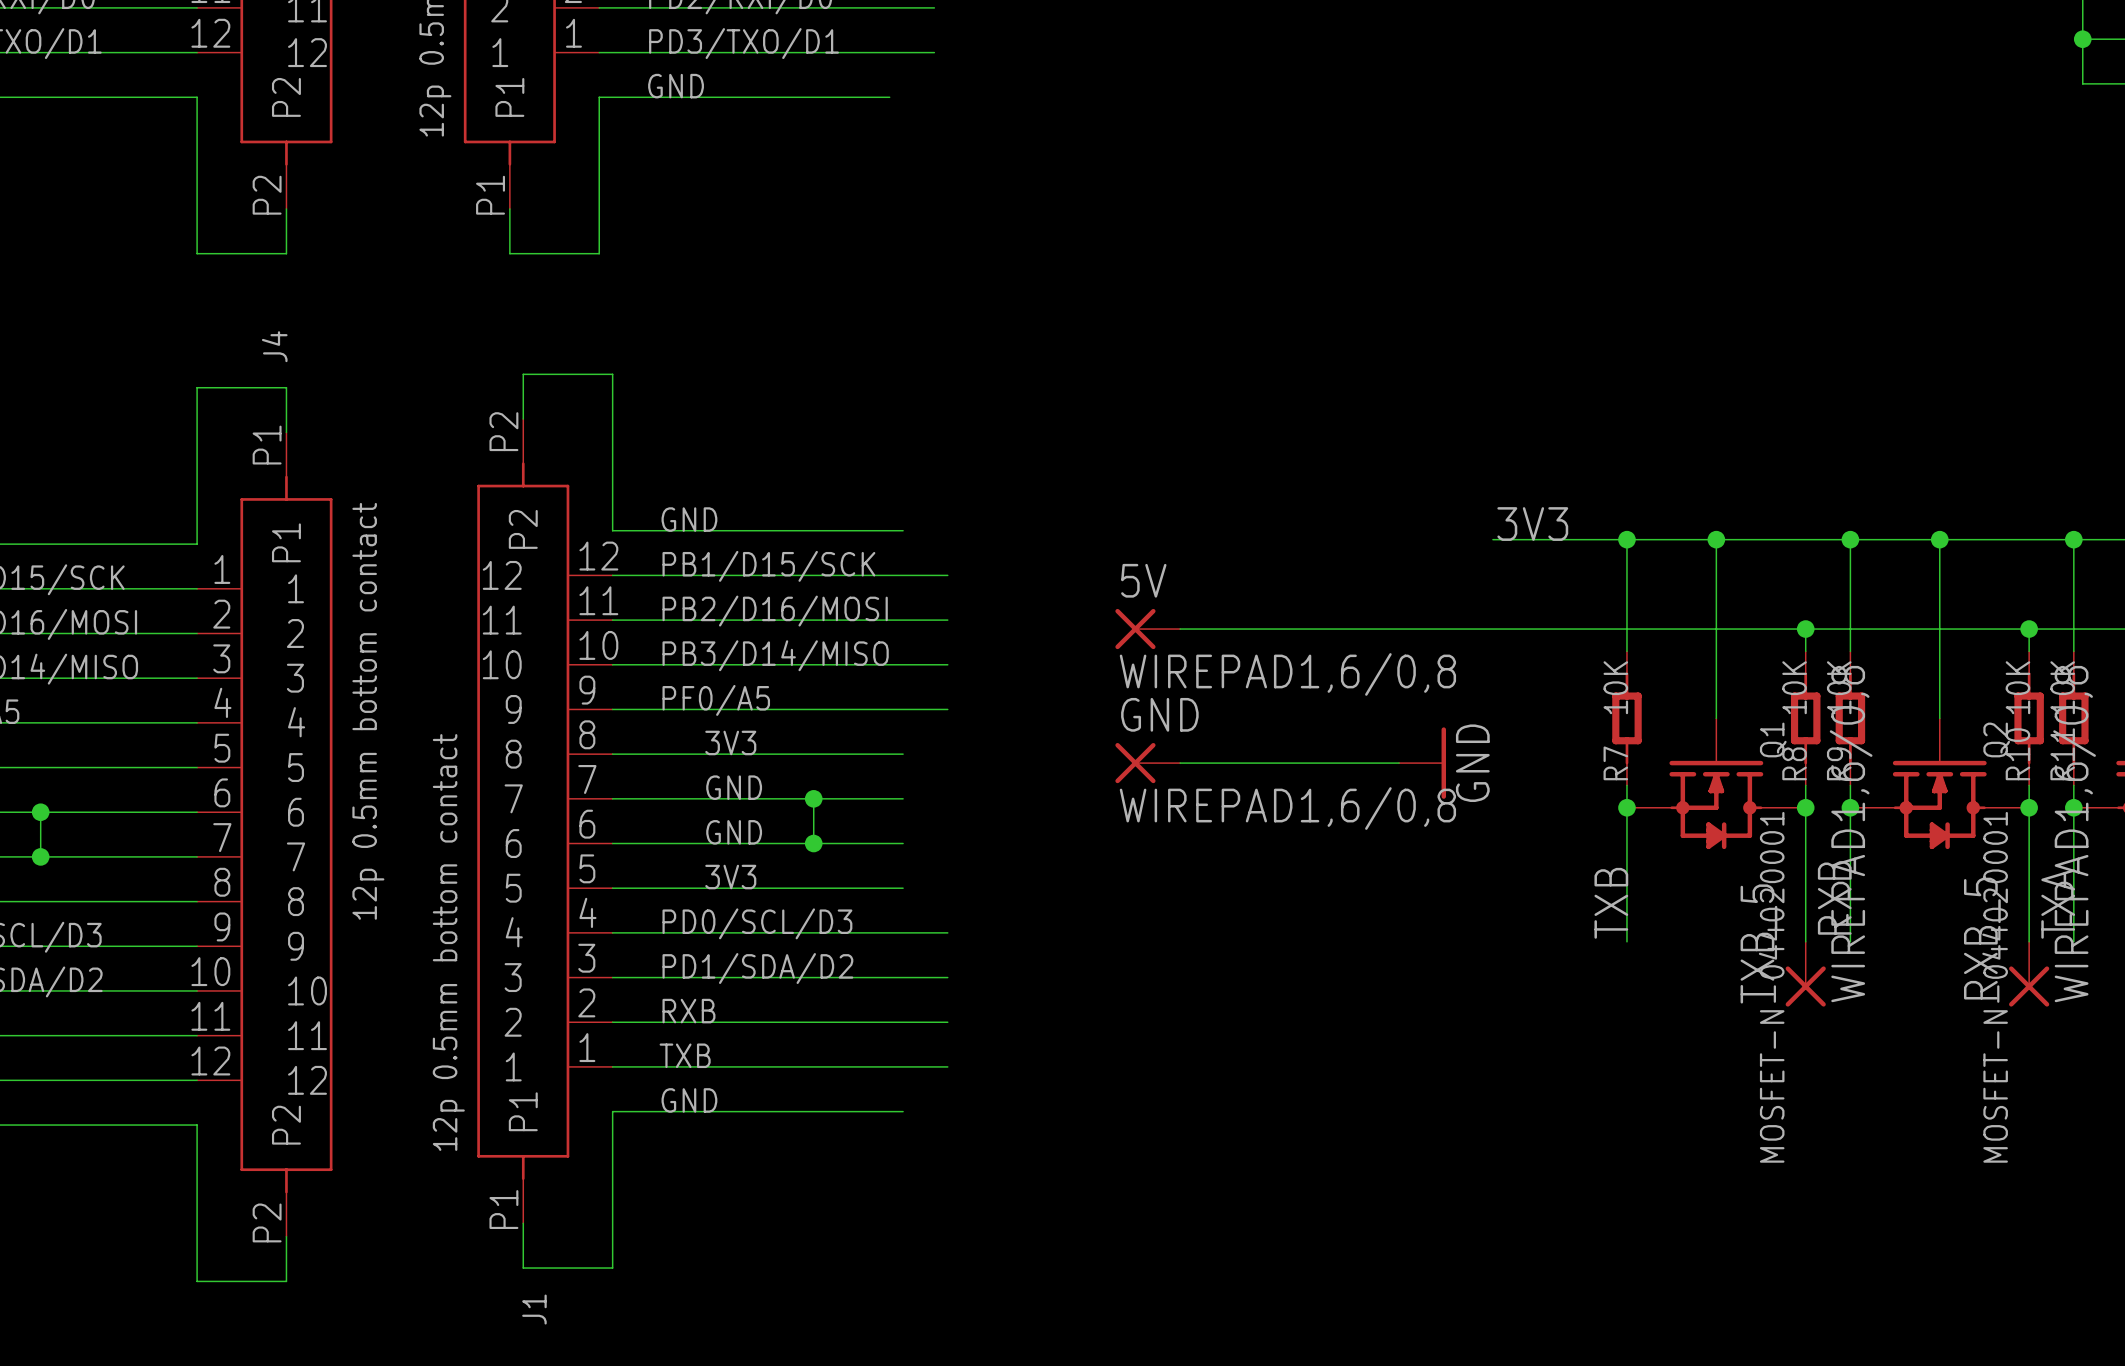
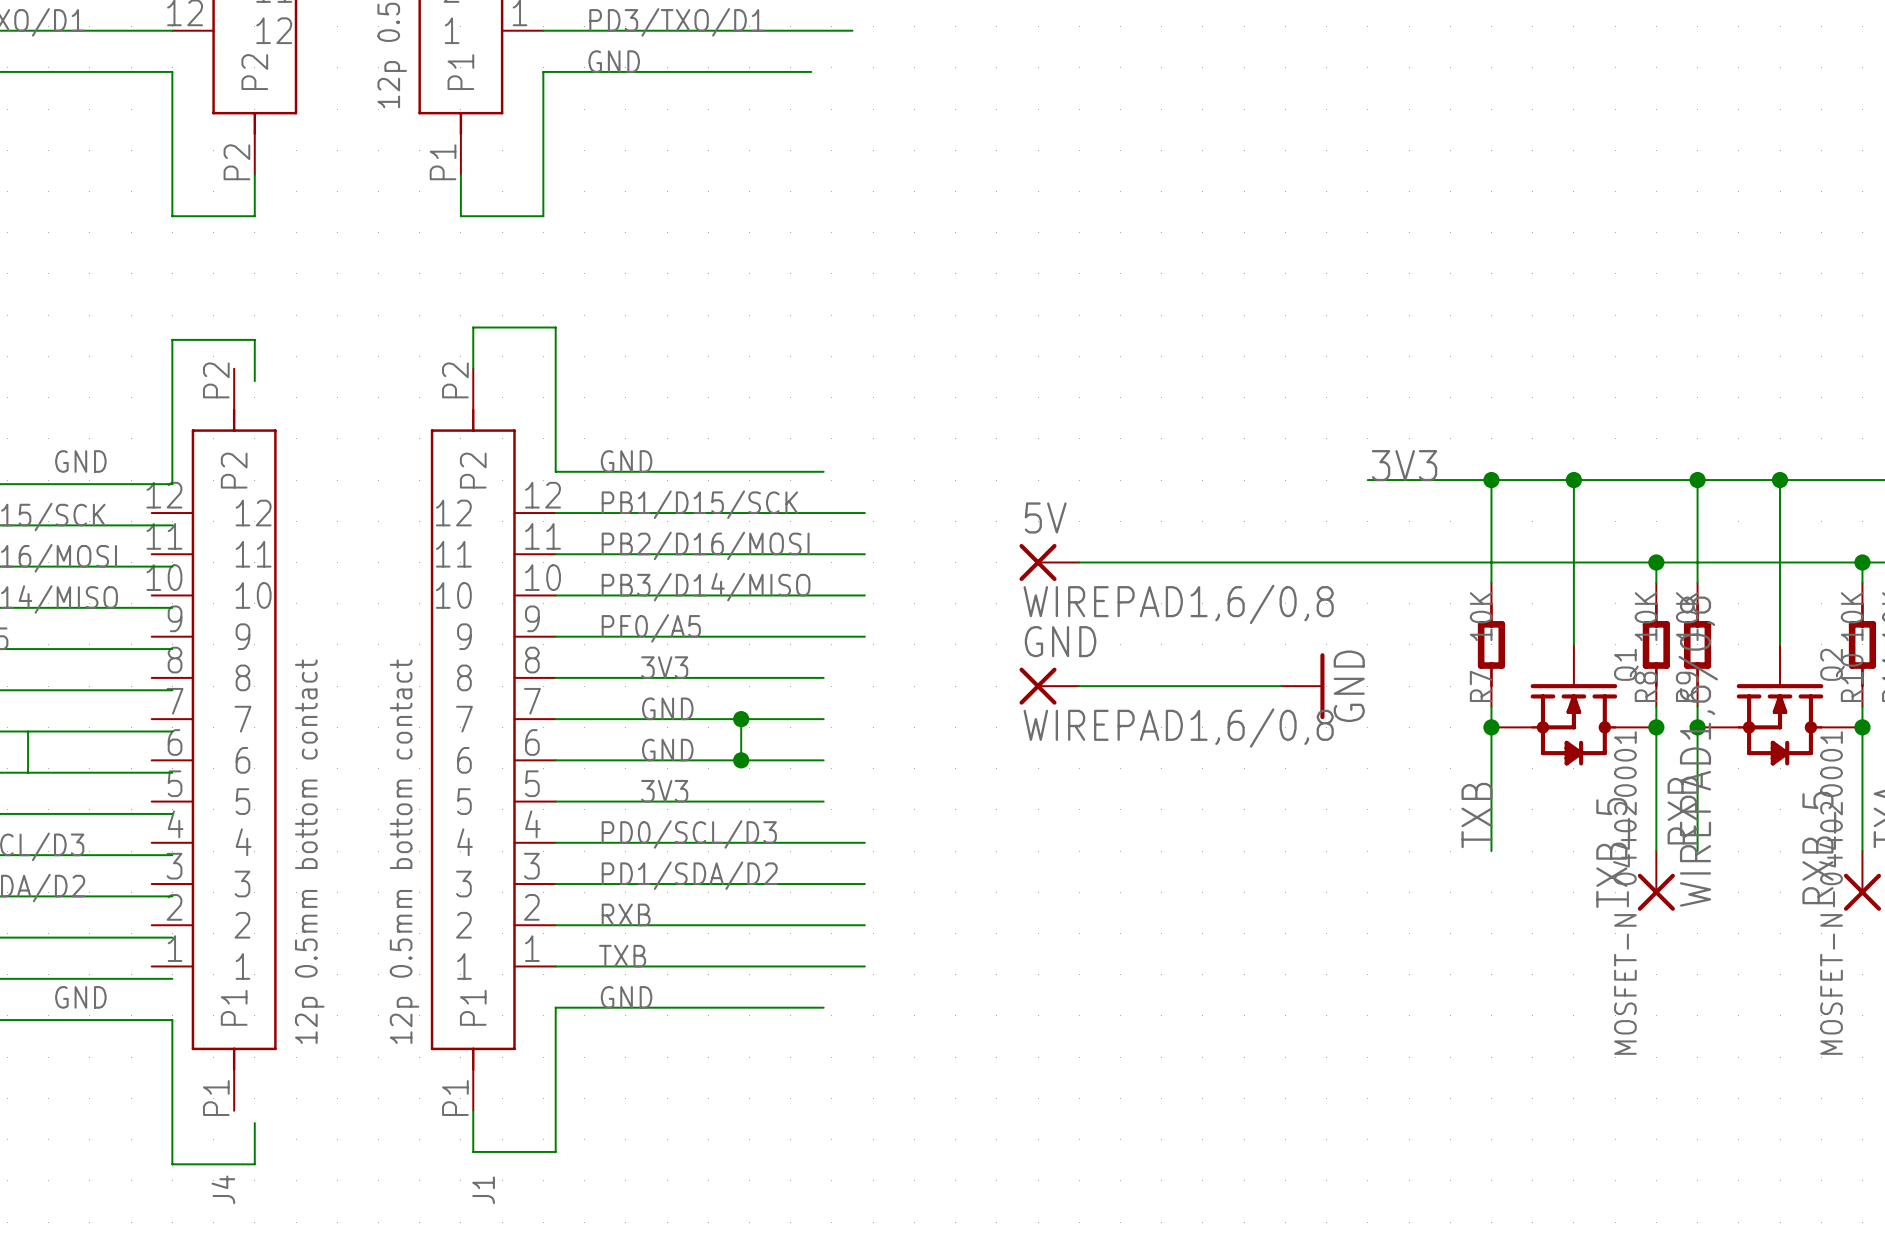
label: none -> GND (80, 461)
junction: (40, 812) -> none
J4 flip: as is (286, 834) -> up-down (234, 739)
junction: (40, 856) -> none
label: none -> GND (80, 997)

